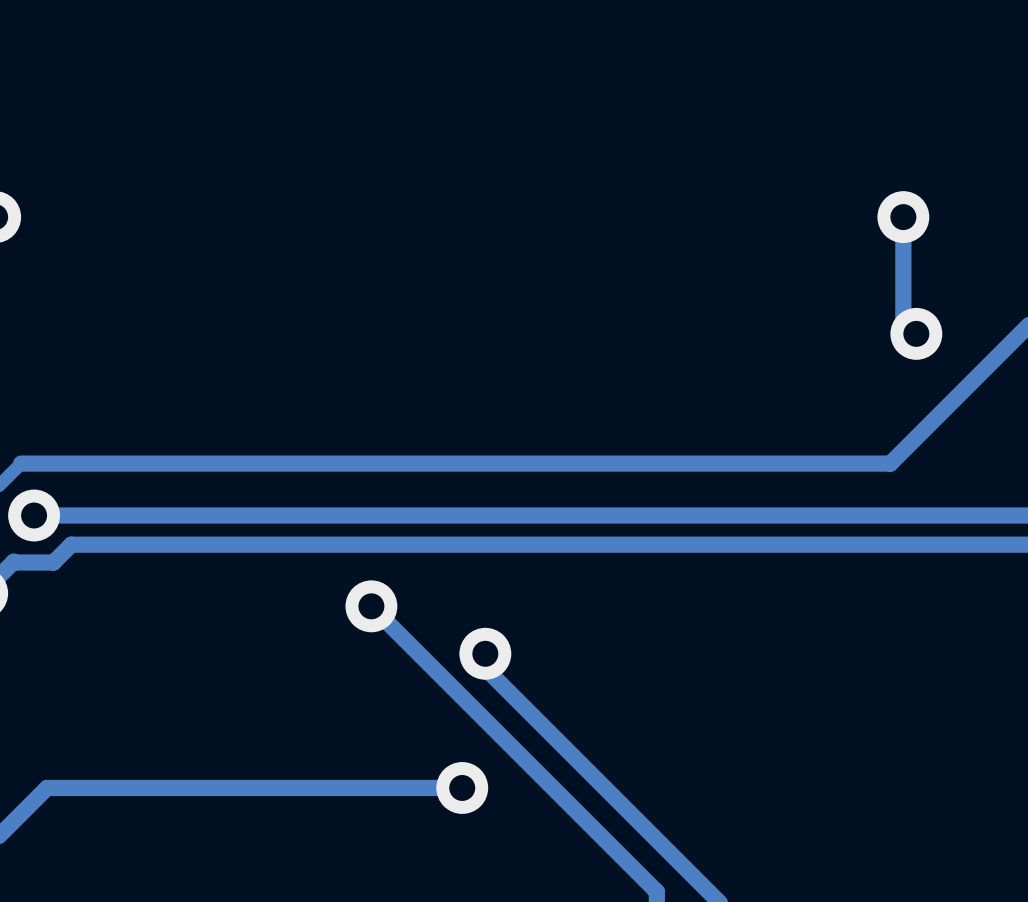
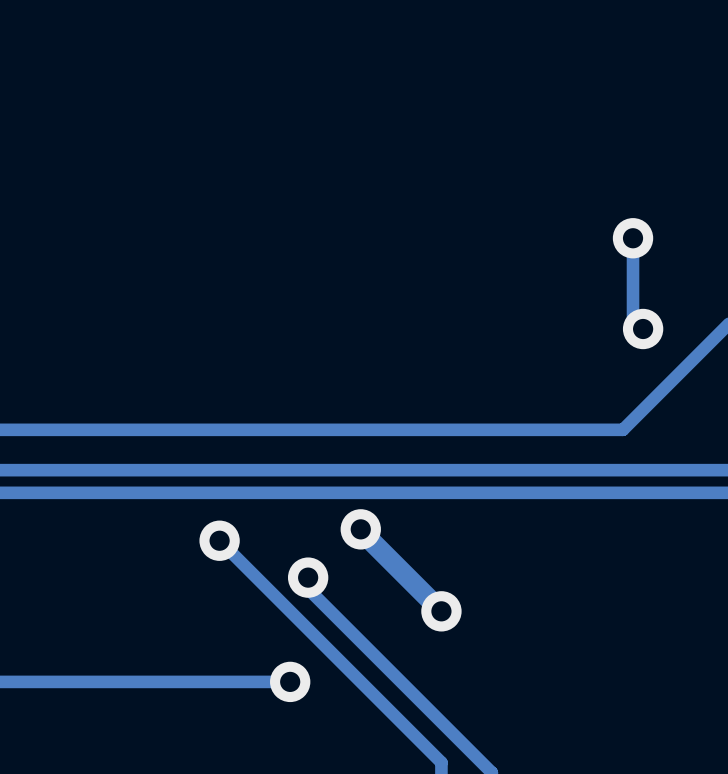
track: none -> (360, 529) (441, 611)
via: none -> (360, 529)
via: none -> (441, 611)

